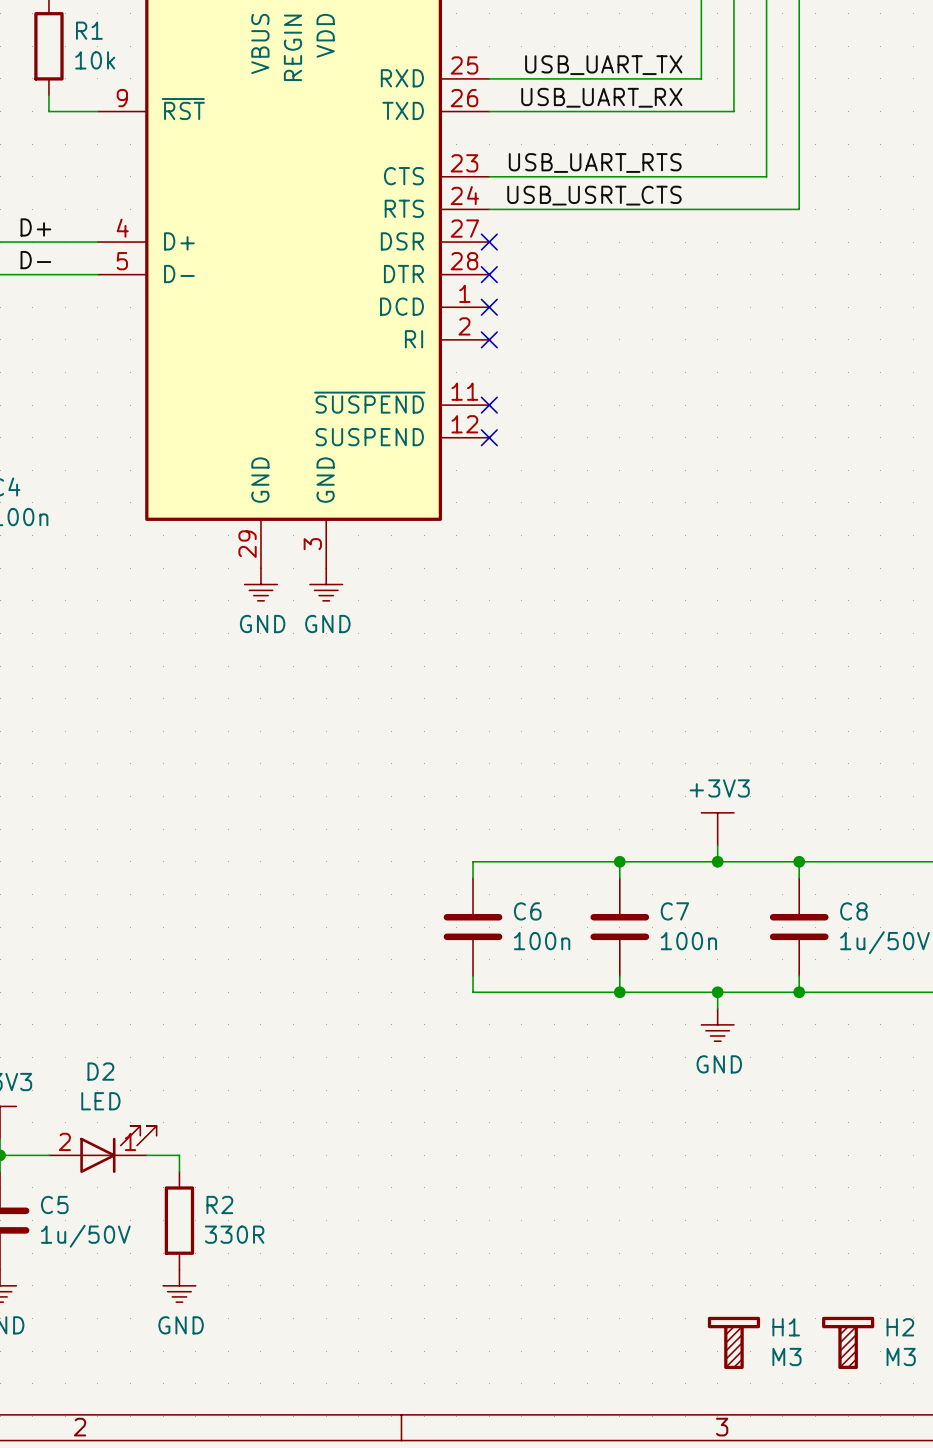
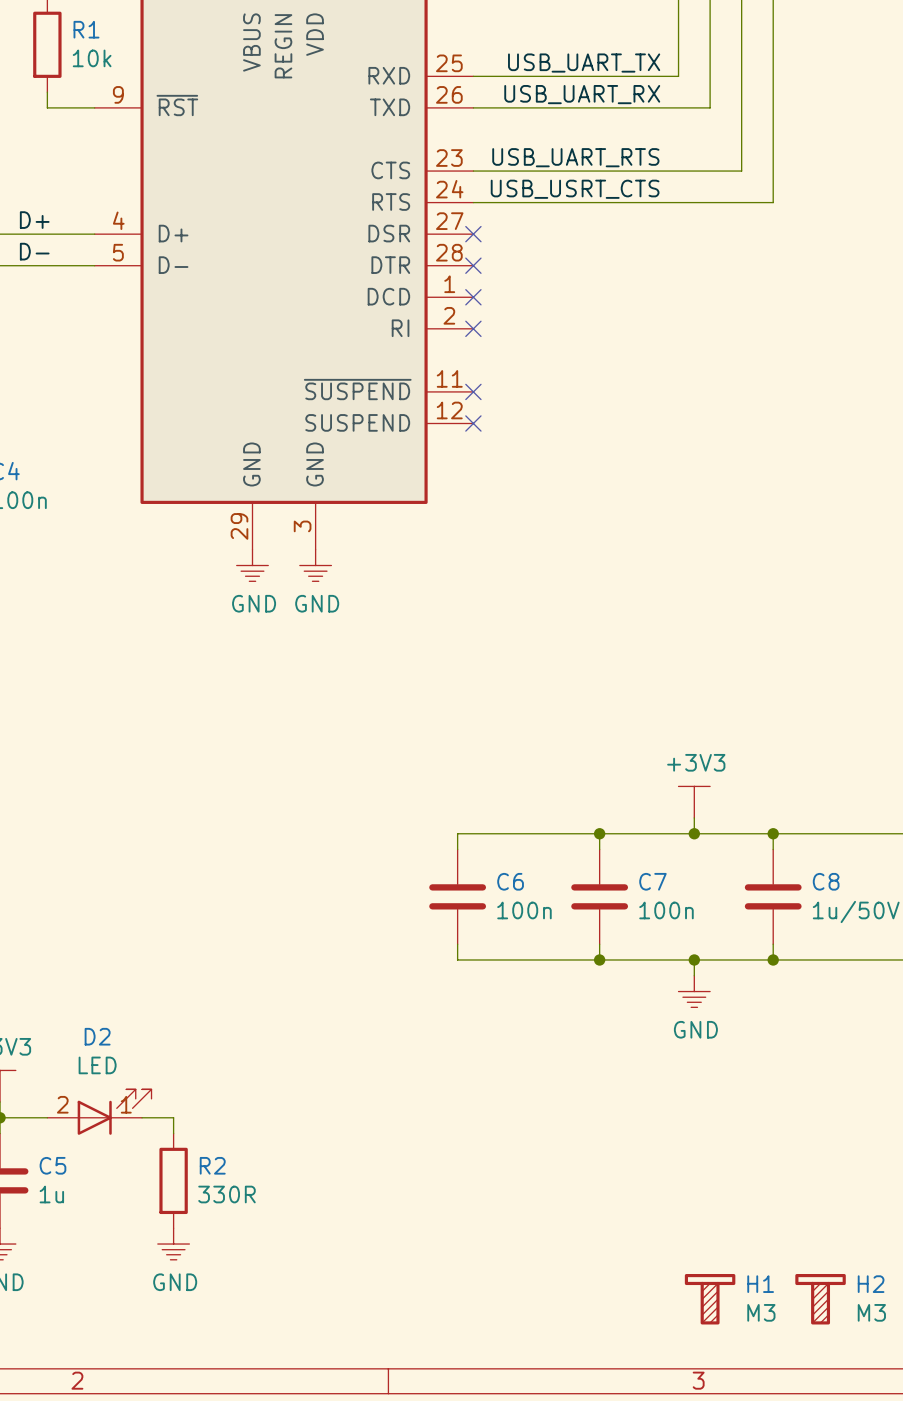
C5 value: 1u/50V (85, 1236) -> 1u (51, 1194)

